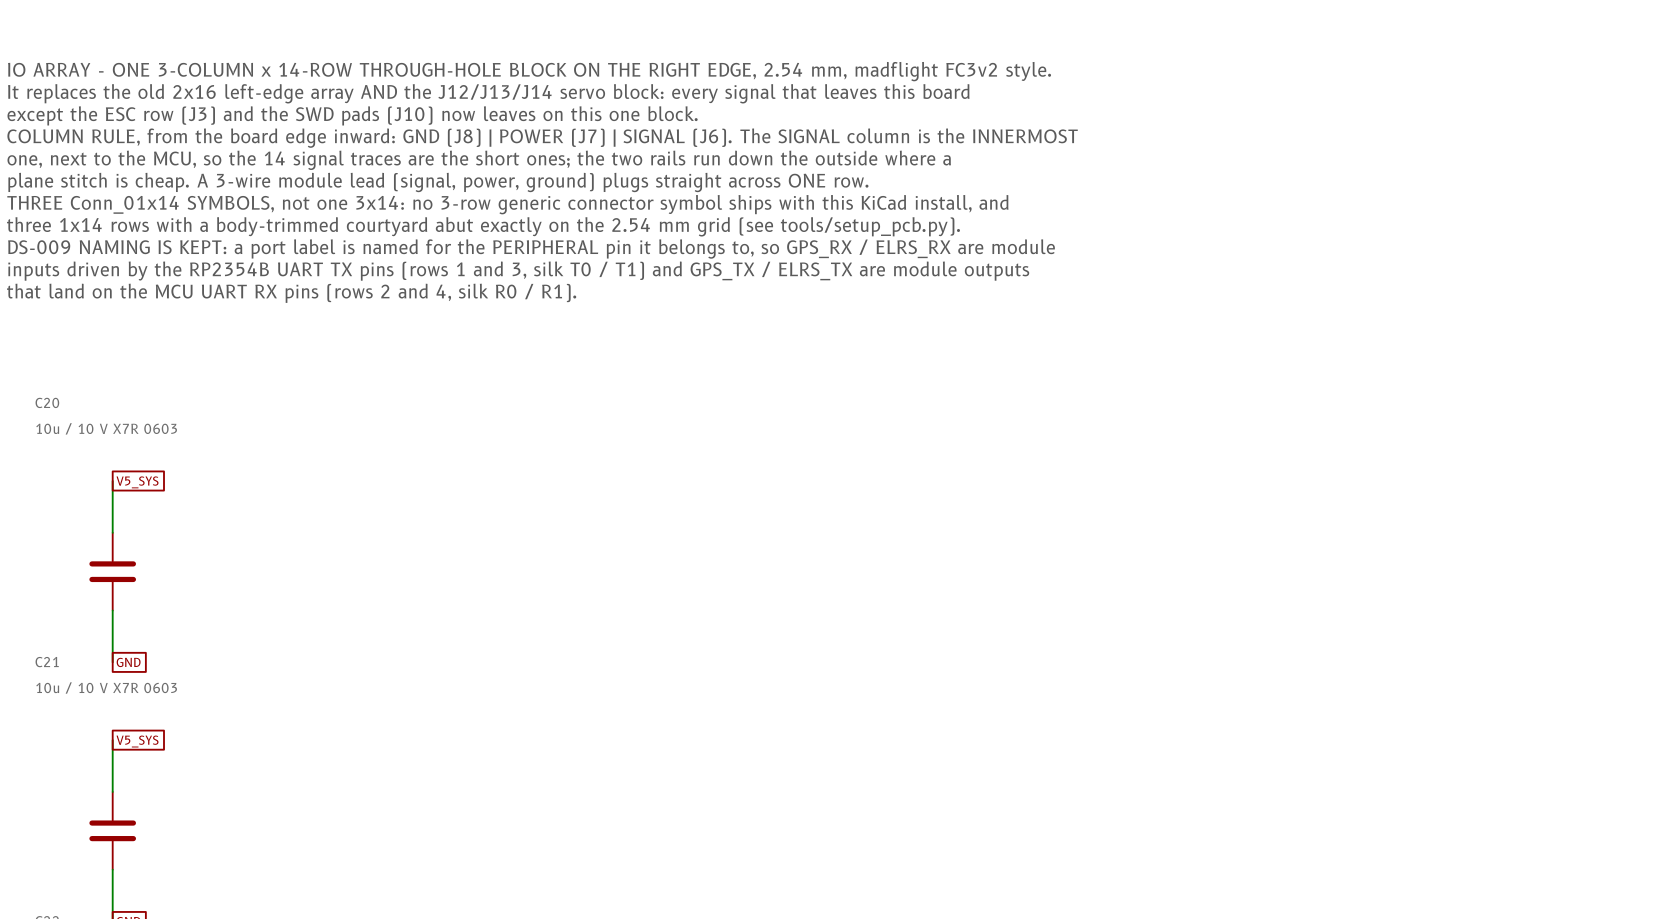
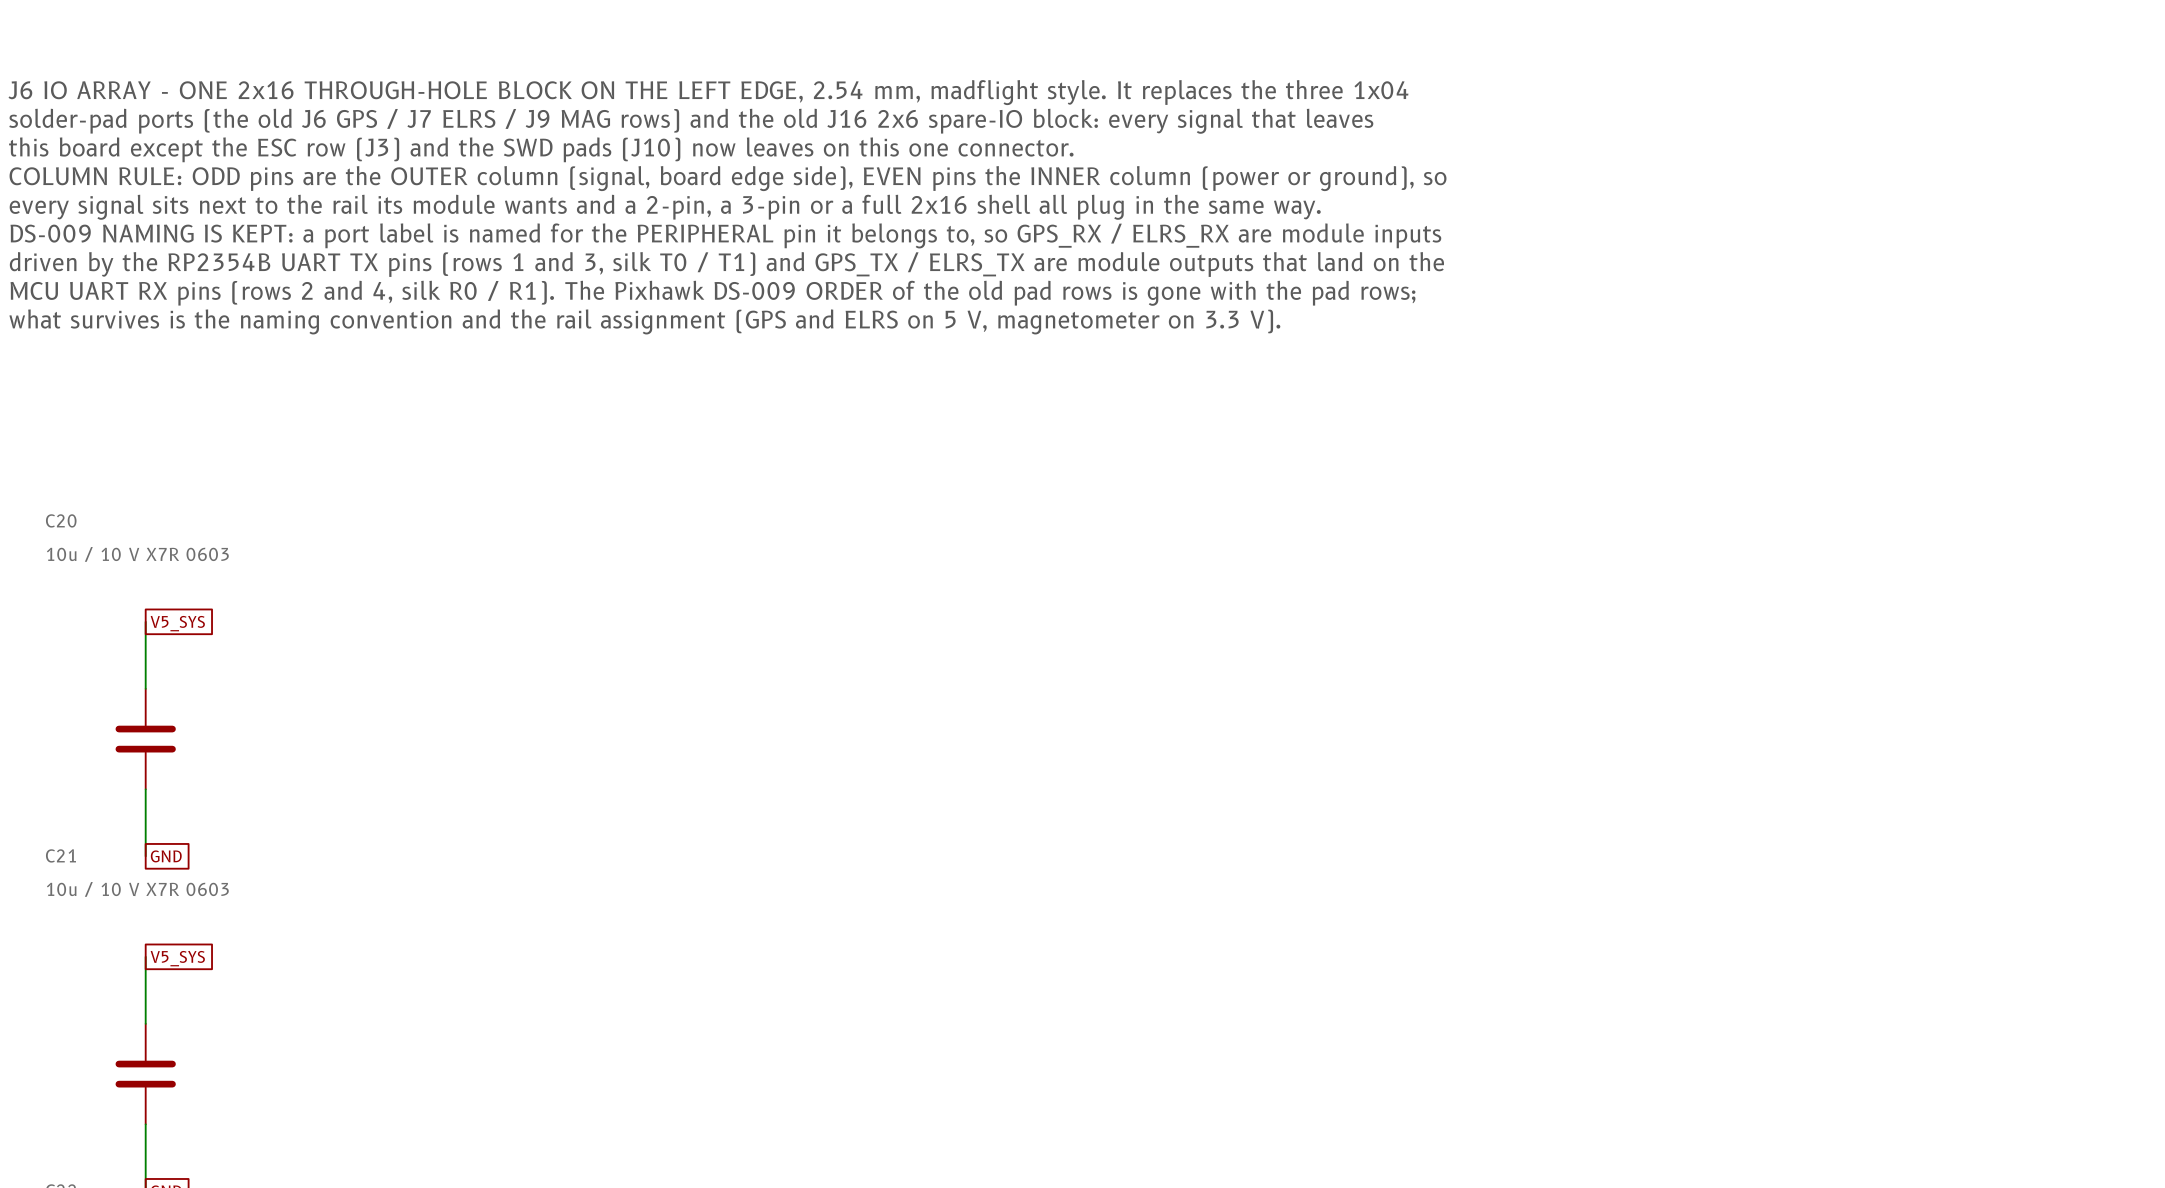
text: IO ARRAY - ONE 3-COLUMN x 14-ROW THROUGH-HOLE BLOCK ON THE RIGHT EDGE, 2.54 mm, madflight FC3v2 style. (529, 71) -> J6 IO ARRAY - ONE 2x16 THROUGH-HOLE BLOCK ON THE LEFT EDGE, 2.54 mm, madflight style. It replaces the three 1x04 (708, 92)
text: It replaces the old 2x16 left-edge array AND the J12/J13/J14 servo block: every signal that leaves this board (488, 93) -> solder-pad ports (the old J6 GPS / J7 ELRS / J9 MAG rows) and the old J16 2x6 spare-IO block: every signal that leaves (691, 121)
text: except the ESC row (J3) and the SWD pads (J10) now leaves on this one block. (352, 115) -> this board except the ESC row (J3) and the SWD pads (J10) now leaves on this one connector. (541, 149)
text: COLUMN RULE, from the board edge inward: GND (J8) | POWER (J7) | SIGNAL (J6). The SIGNAL column is the INNERMOST (542, 138) -> COLUMN RULE: ODD pins are the OUTER column (signal, board edge side), EVEN pins the INNER column (power or ground), so (728, 178)
text: one, next to the MCU, so the 14 signal traces are the short ones; the two rails run down the outside where a (479, 160) -> every signal sits next to the rail its module wants and a 2-pin, a 3-pin or a full 2x16 shell all plug in the same way. (665, 207)
text: plane stitch is cheap. A 3-wire module lead (signal, power, ground) plugs straight across ONE row. (438, 182) -> DS-009 NAMING IS KEPT: a port label is named for the PERIPHERAL pin it belongs to, so GPS_RX / ELRS_RX are module inputs (725, 235)
text: THREE Conn_01x14 SYMBOLS, not one 3x14: no 3-row generic connector symbol ships with this KiCad install, and (507, 204) -> driven by the RP2354B UART TX pins (rows 1 and 3, silk T0 / T1) and GPS_TX / ELRS_TX are module outputs that land on the (726, 264)
text: three 1x14 rows with a body-trimmed courtyard abut exactly on the 2.54 mm grid (see tools/setup_pcb.py). (483, 226) -> MCU UART RX pins (rows 2 and 4, silk R0 / R1). The Pixhawk DS-009 ORDER of the old pad rows is gone with the pad rows; (712, 293)
text: DS-009 NAMING IS KEPT: a port label is named for the PERIPHERAL pin it belongs to, so GPS_RX / ELRS_RX are module (531, 249) -> what survives is the naming convention and the rail assignment (GPS and ELRS on 5 V, magnetometer on 3.3 V). (644, 321)
text: inputs driven by the RP2354B UART TX pins (rows 1 and 3, silk T0 / T1) and GPS_TX / ELRS_TX are module outputs (518, 271) -> none
text: that land on the MCU UART RX pins (rows 2 and 4, silk R0 / R1). (291, 293) -> none

